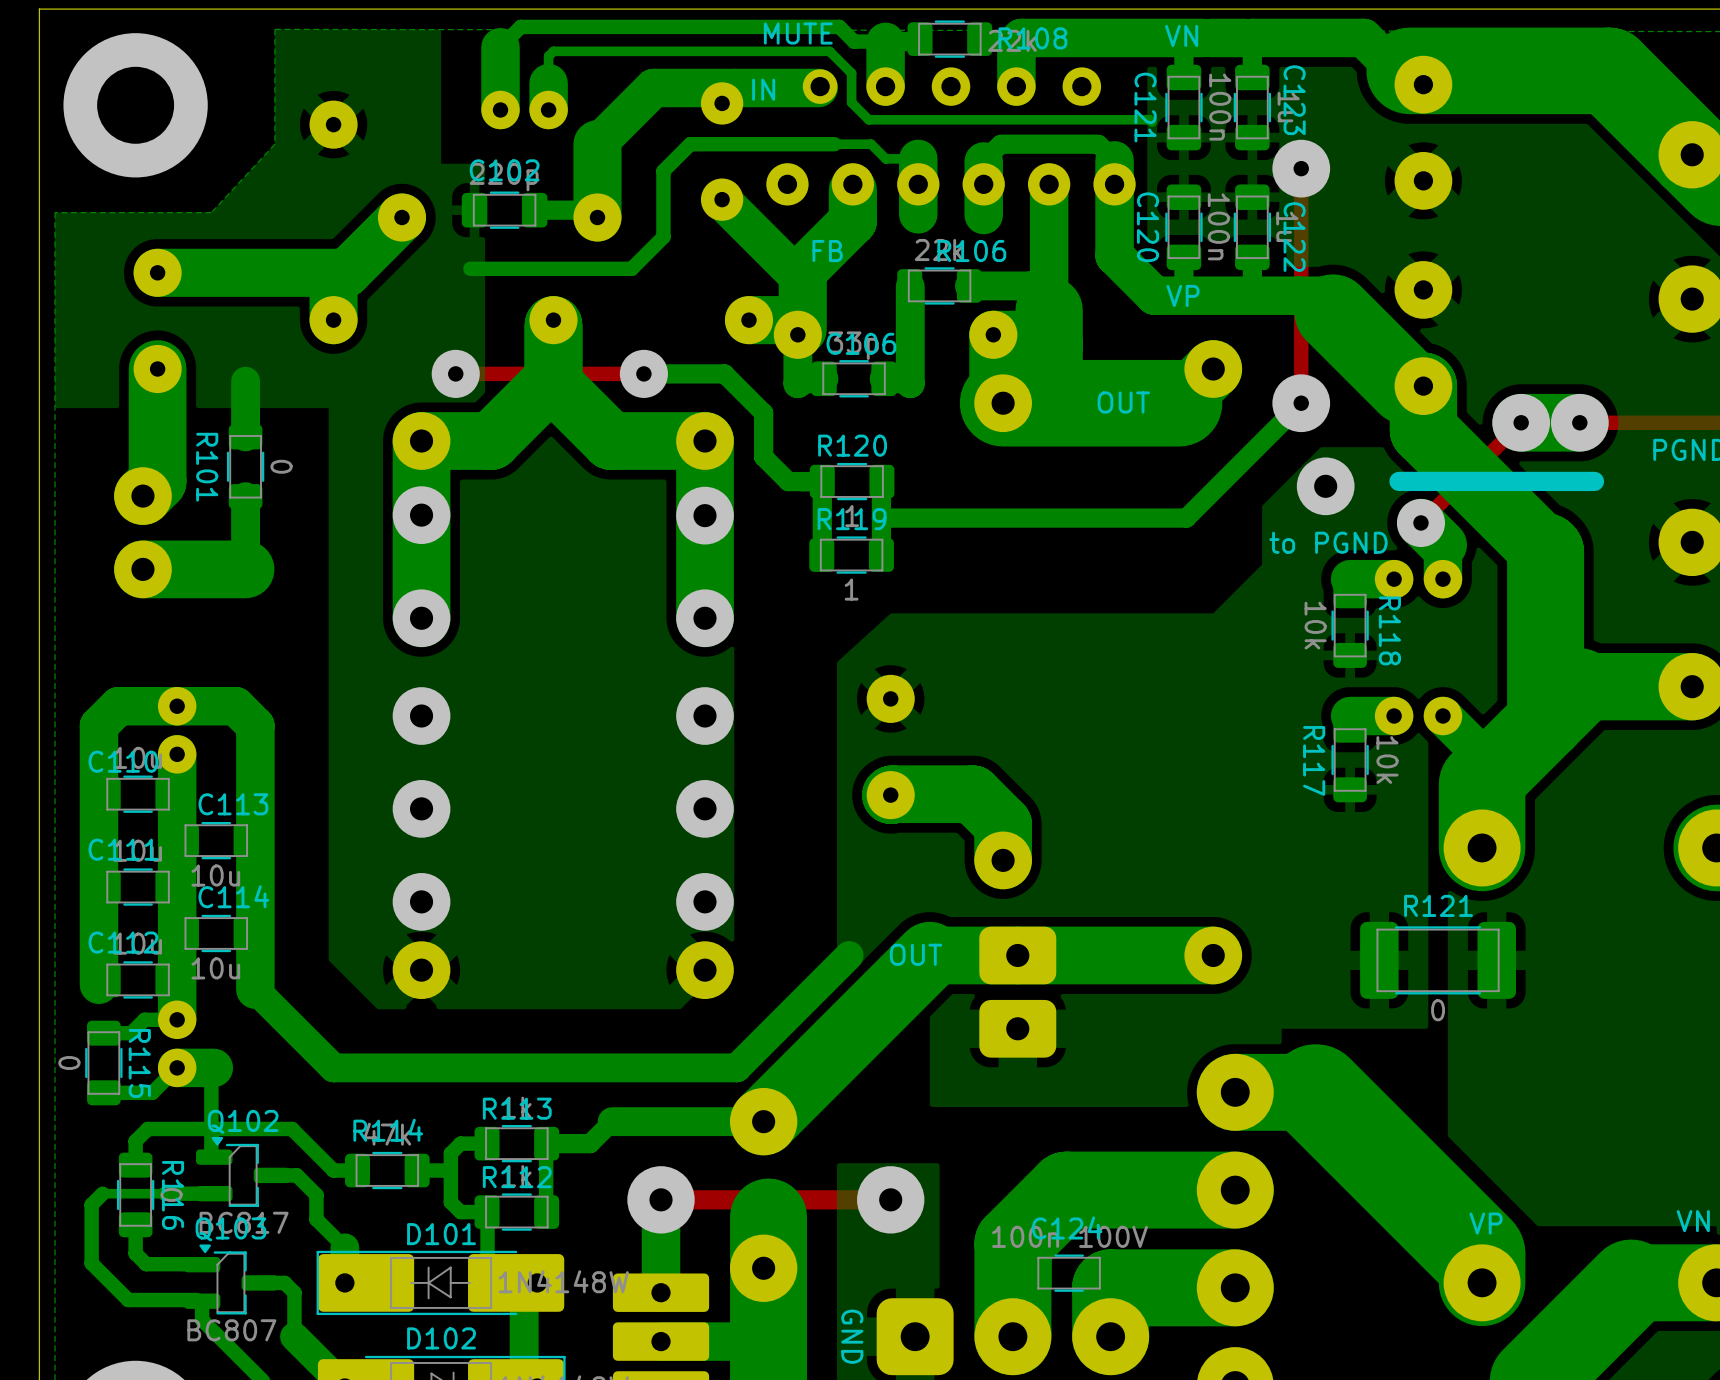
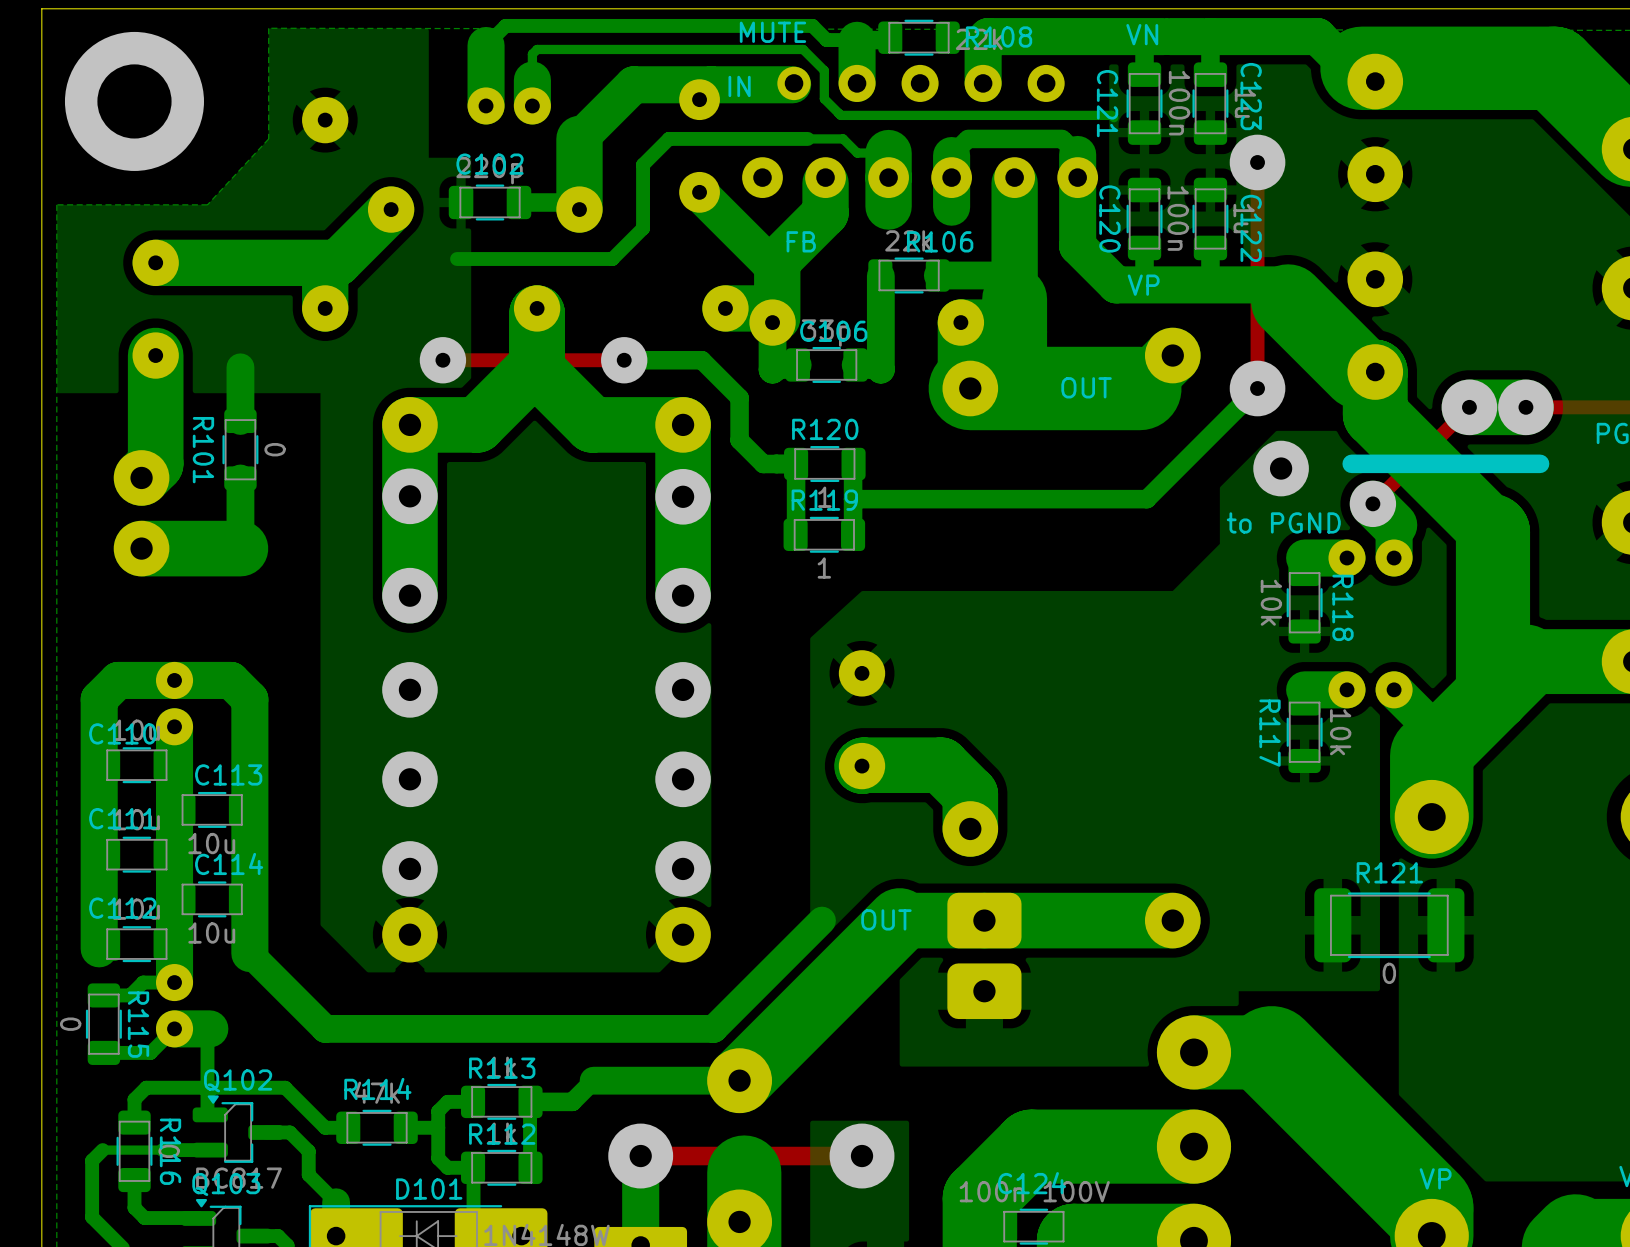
bottom track width: thin (918, 158) (918, 214) -> thick (888, 153) (888, 206)
bottom track width: thin (1049, 190) (1049, 310) -> thick (1014, 183) (1014, 299)

